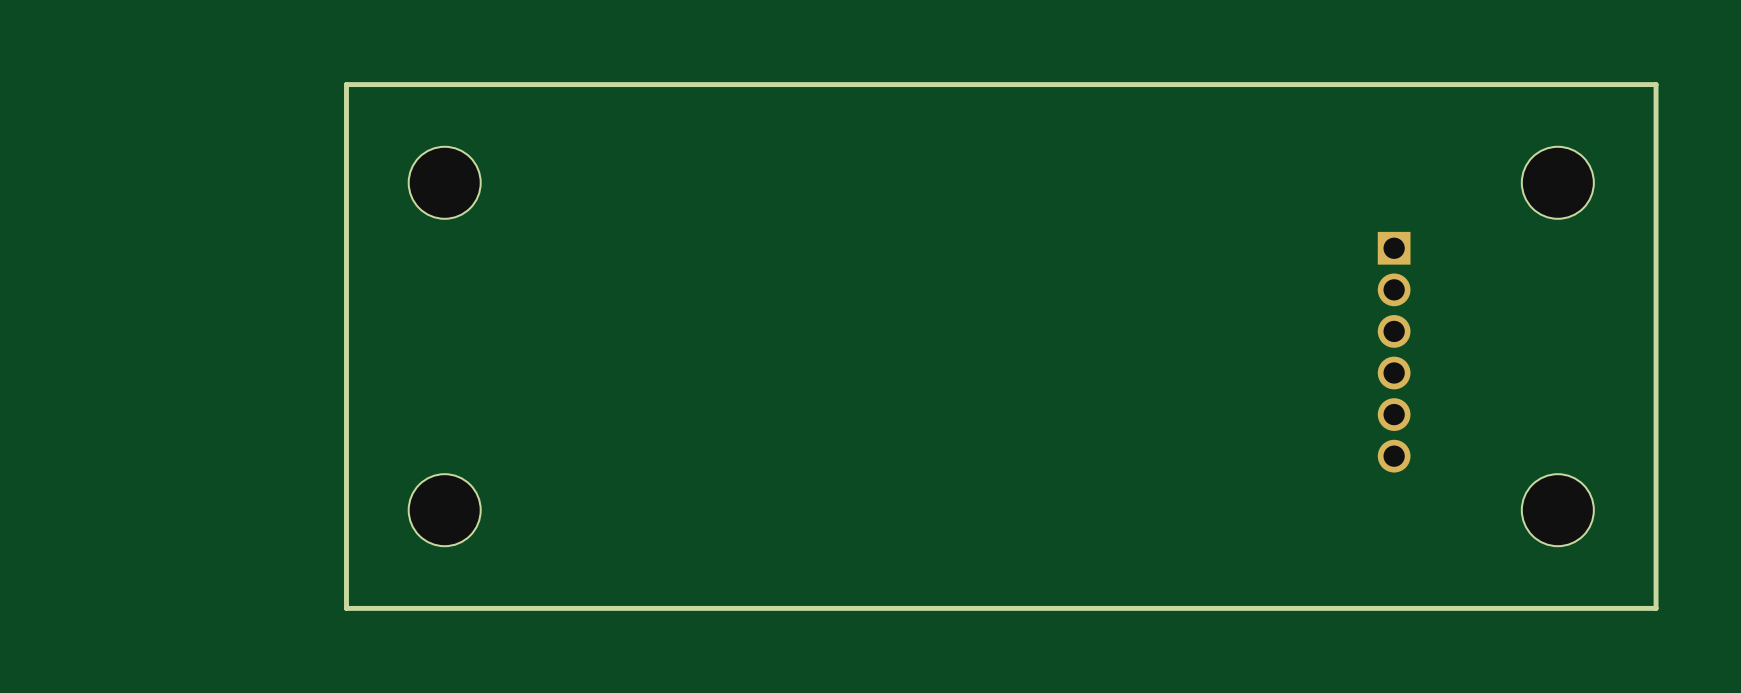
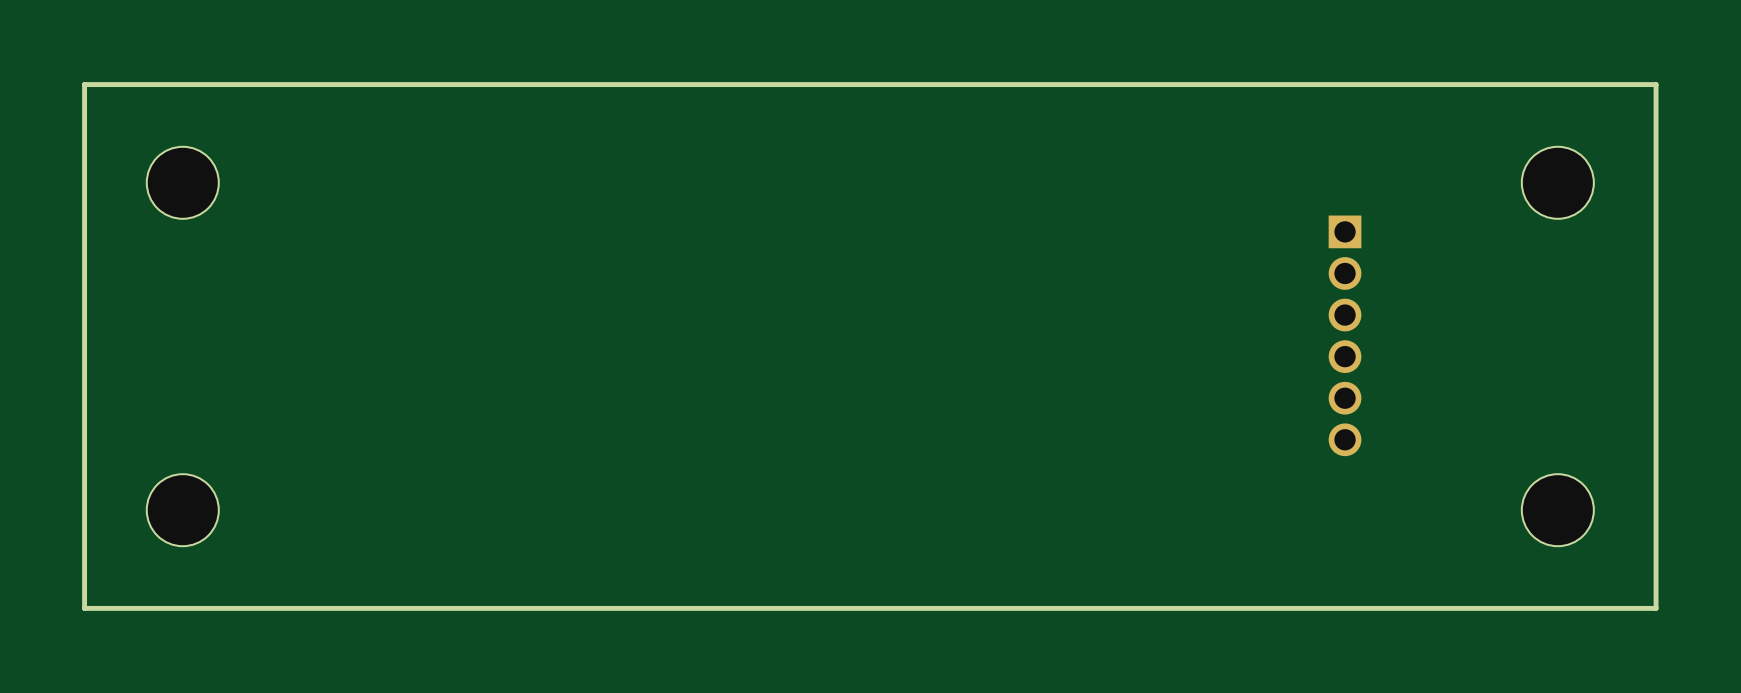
board edge: (346, 84) (346, 608) -> (346, 84) (84, 84) (84, 608) (346, 608)
part: none -> (182, 182)
part: (444, 182) -> none
part position: (1394, 352) -> (1345, 335)
part: none -> (182, 510)
part: (444, 510) -> none

